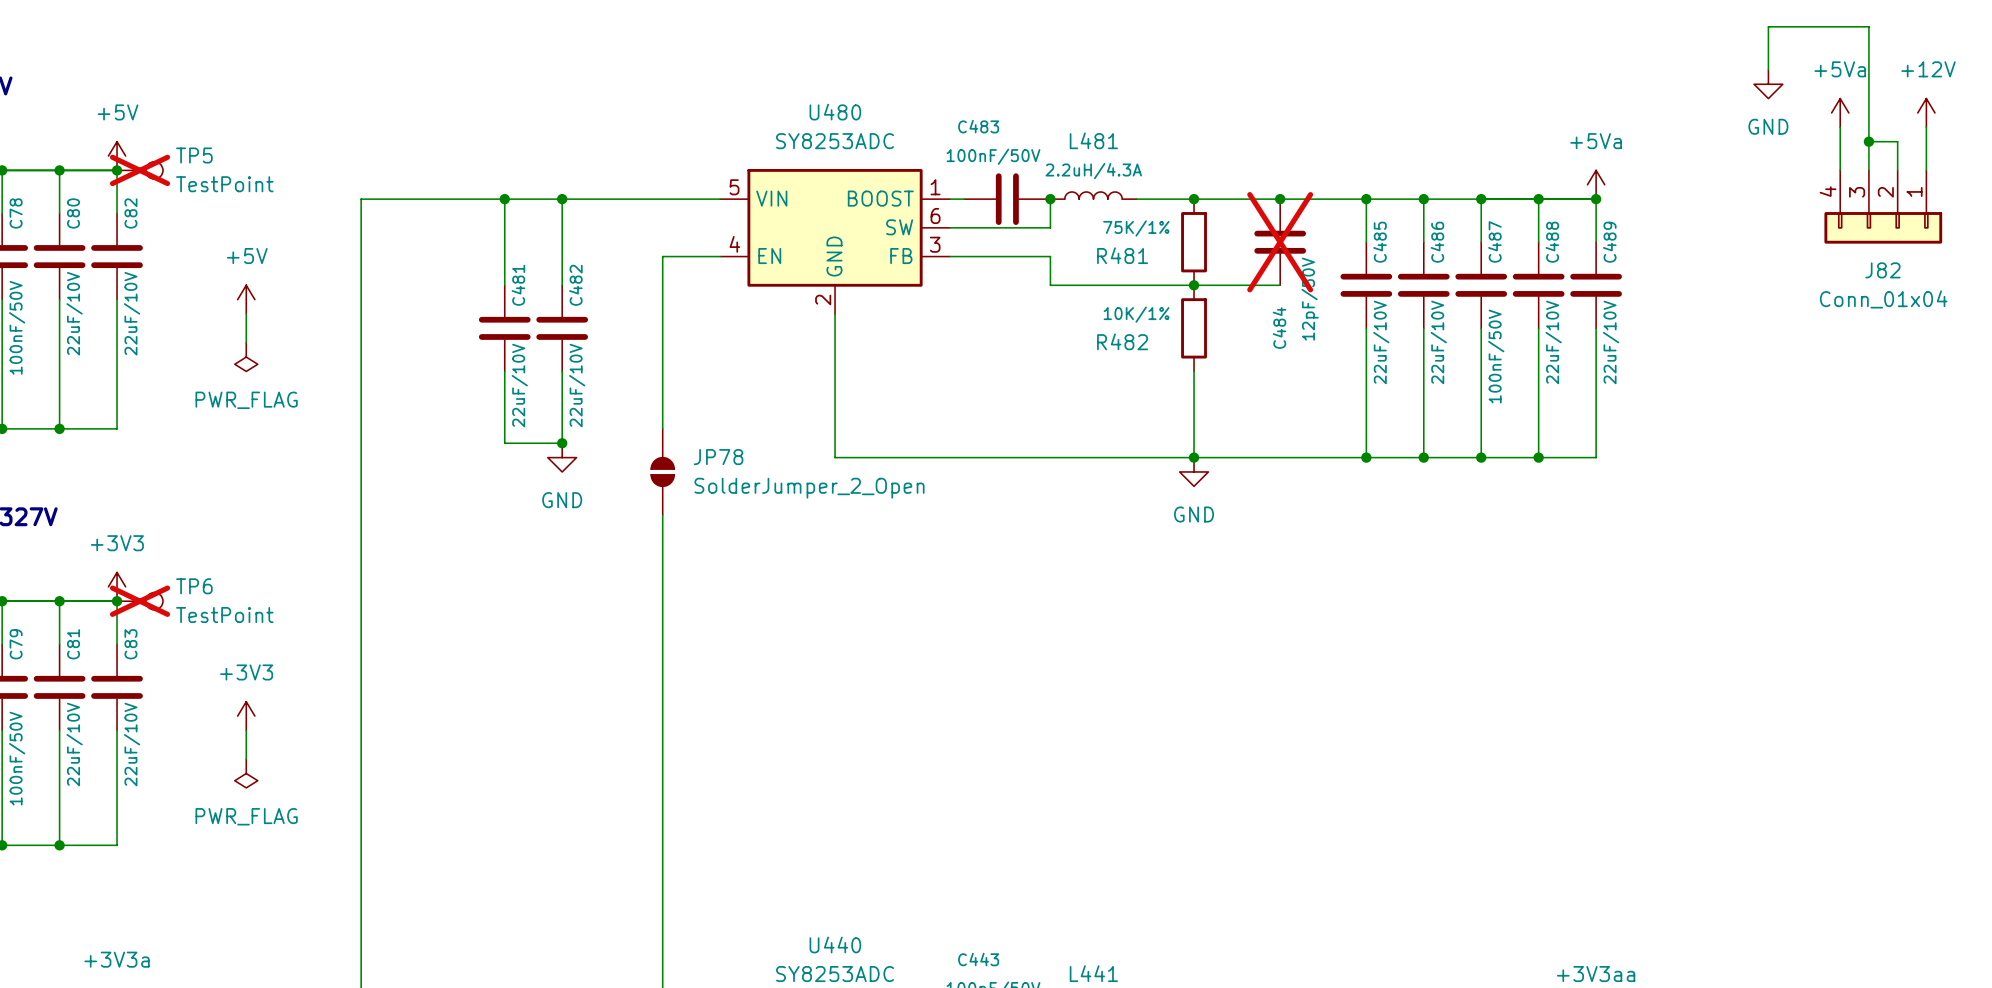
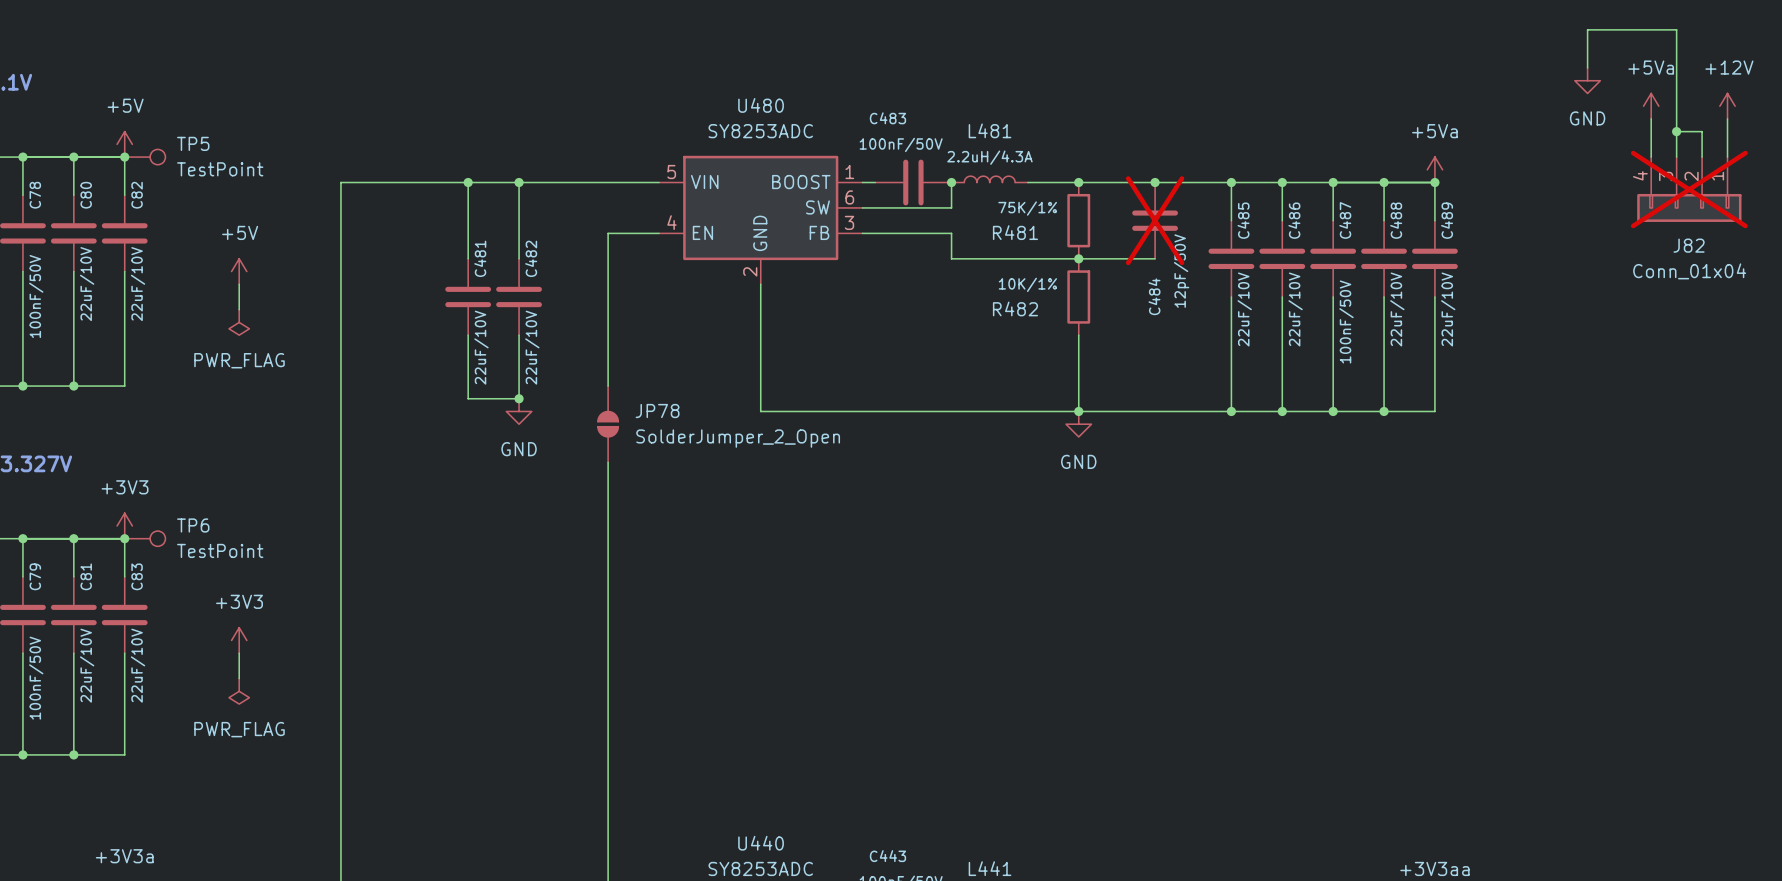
TP5 do-not-place cross: (140, 170) -> none
J82 do-not-place cross: none -> (1689, 189)
TP6 do-not-place cross: (140, 601) -> none

